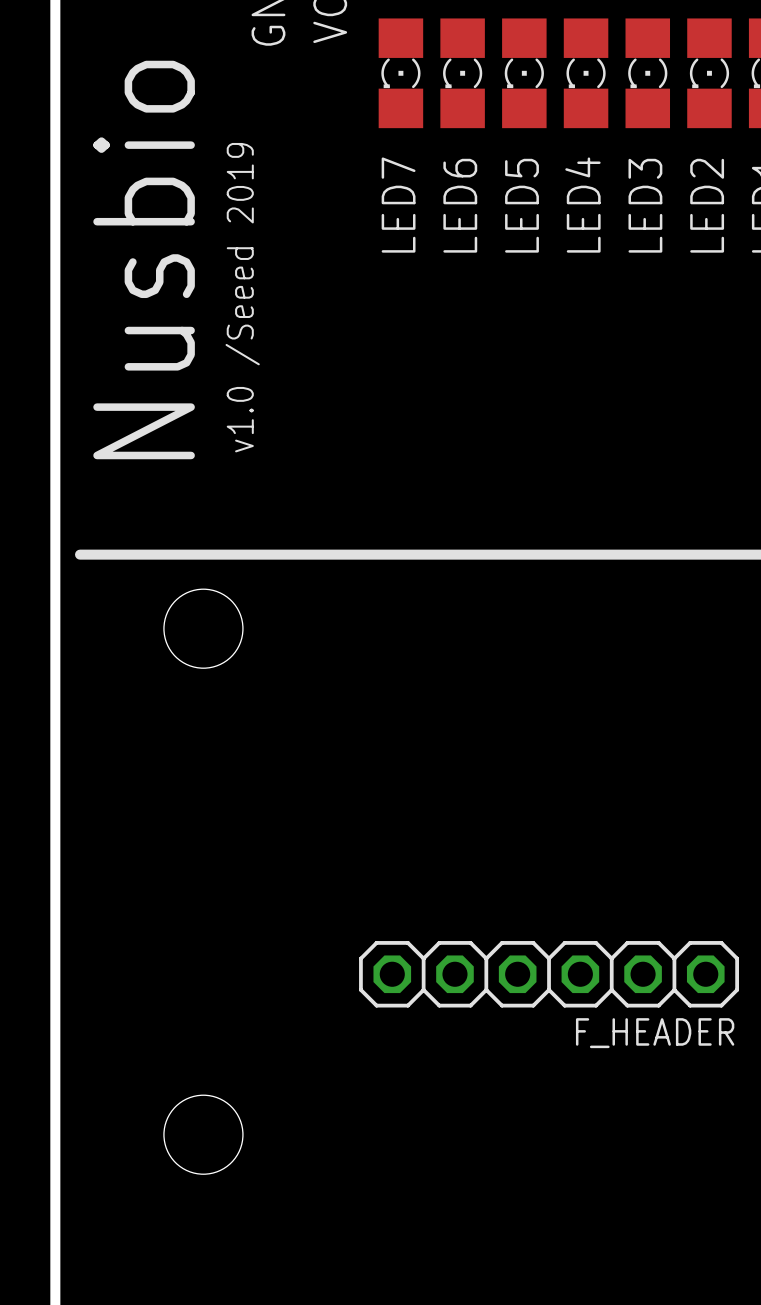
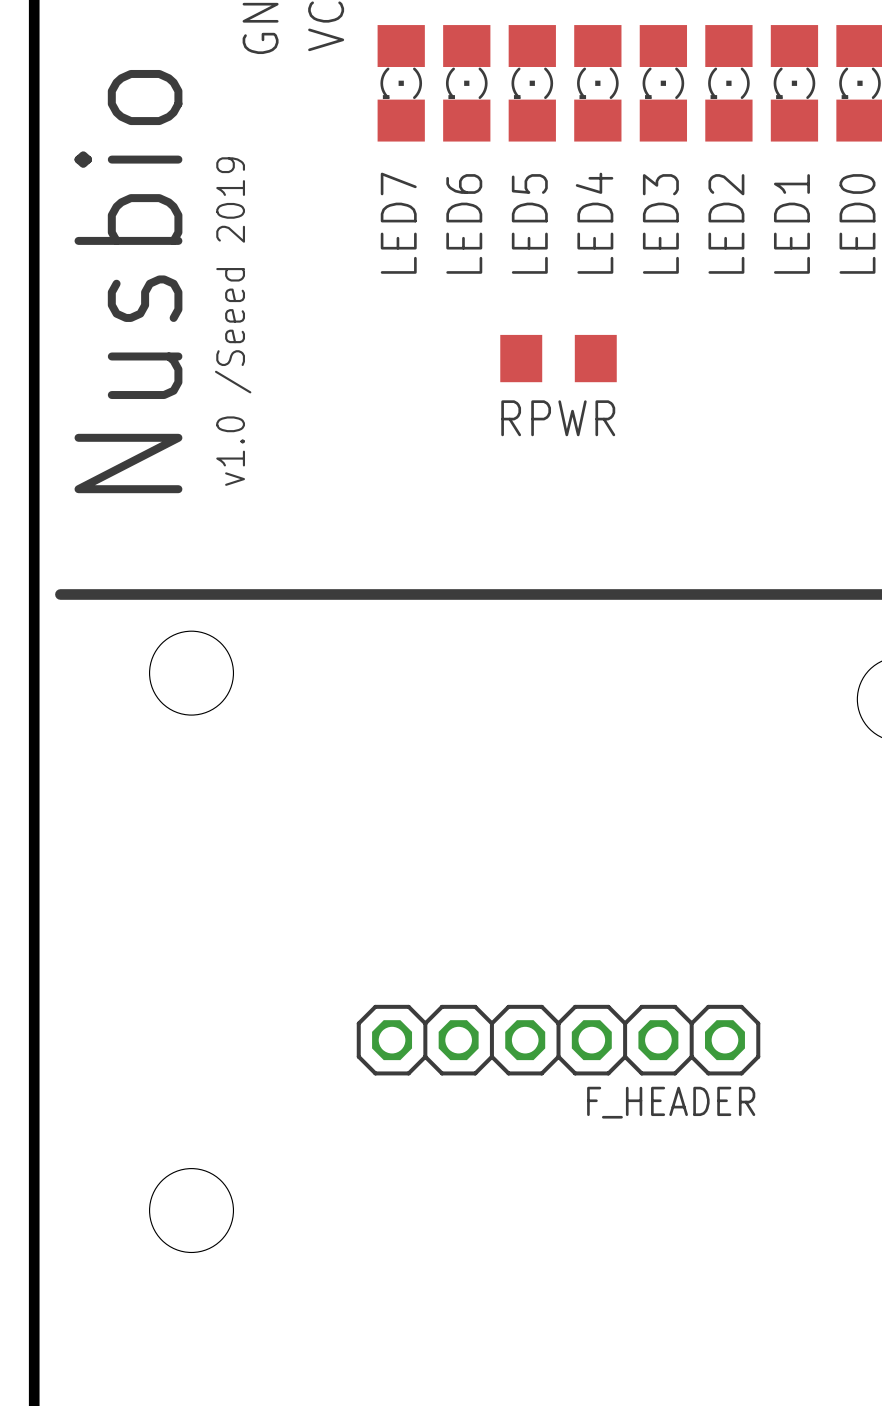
RPWR: none -> (558, 358)

